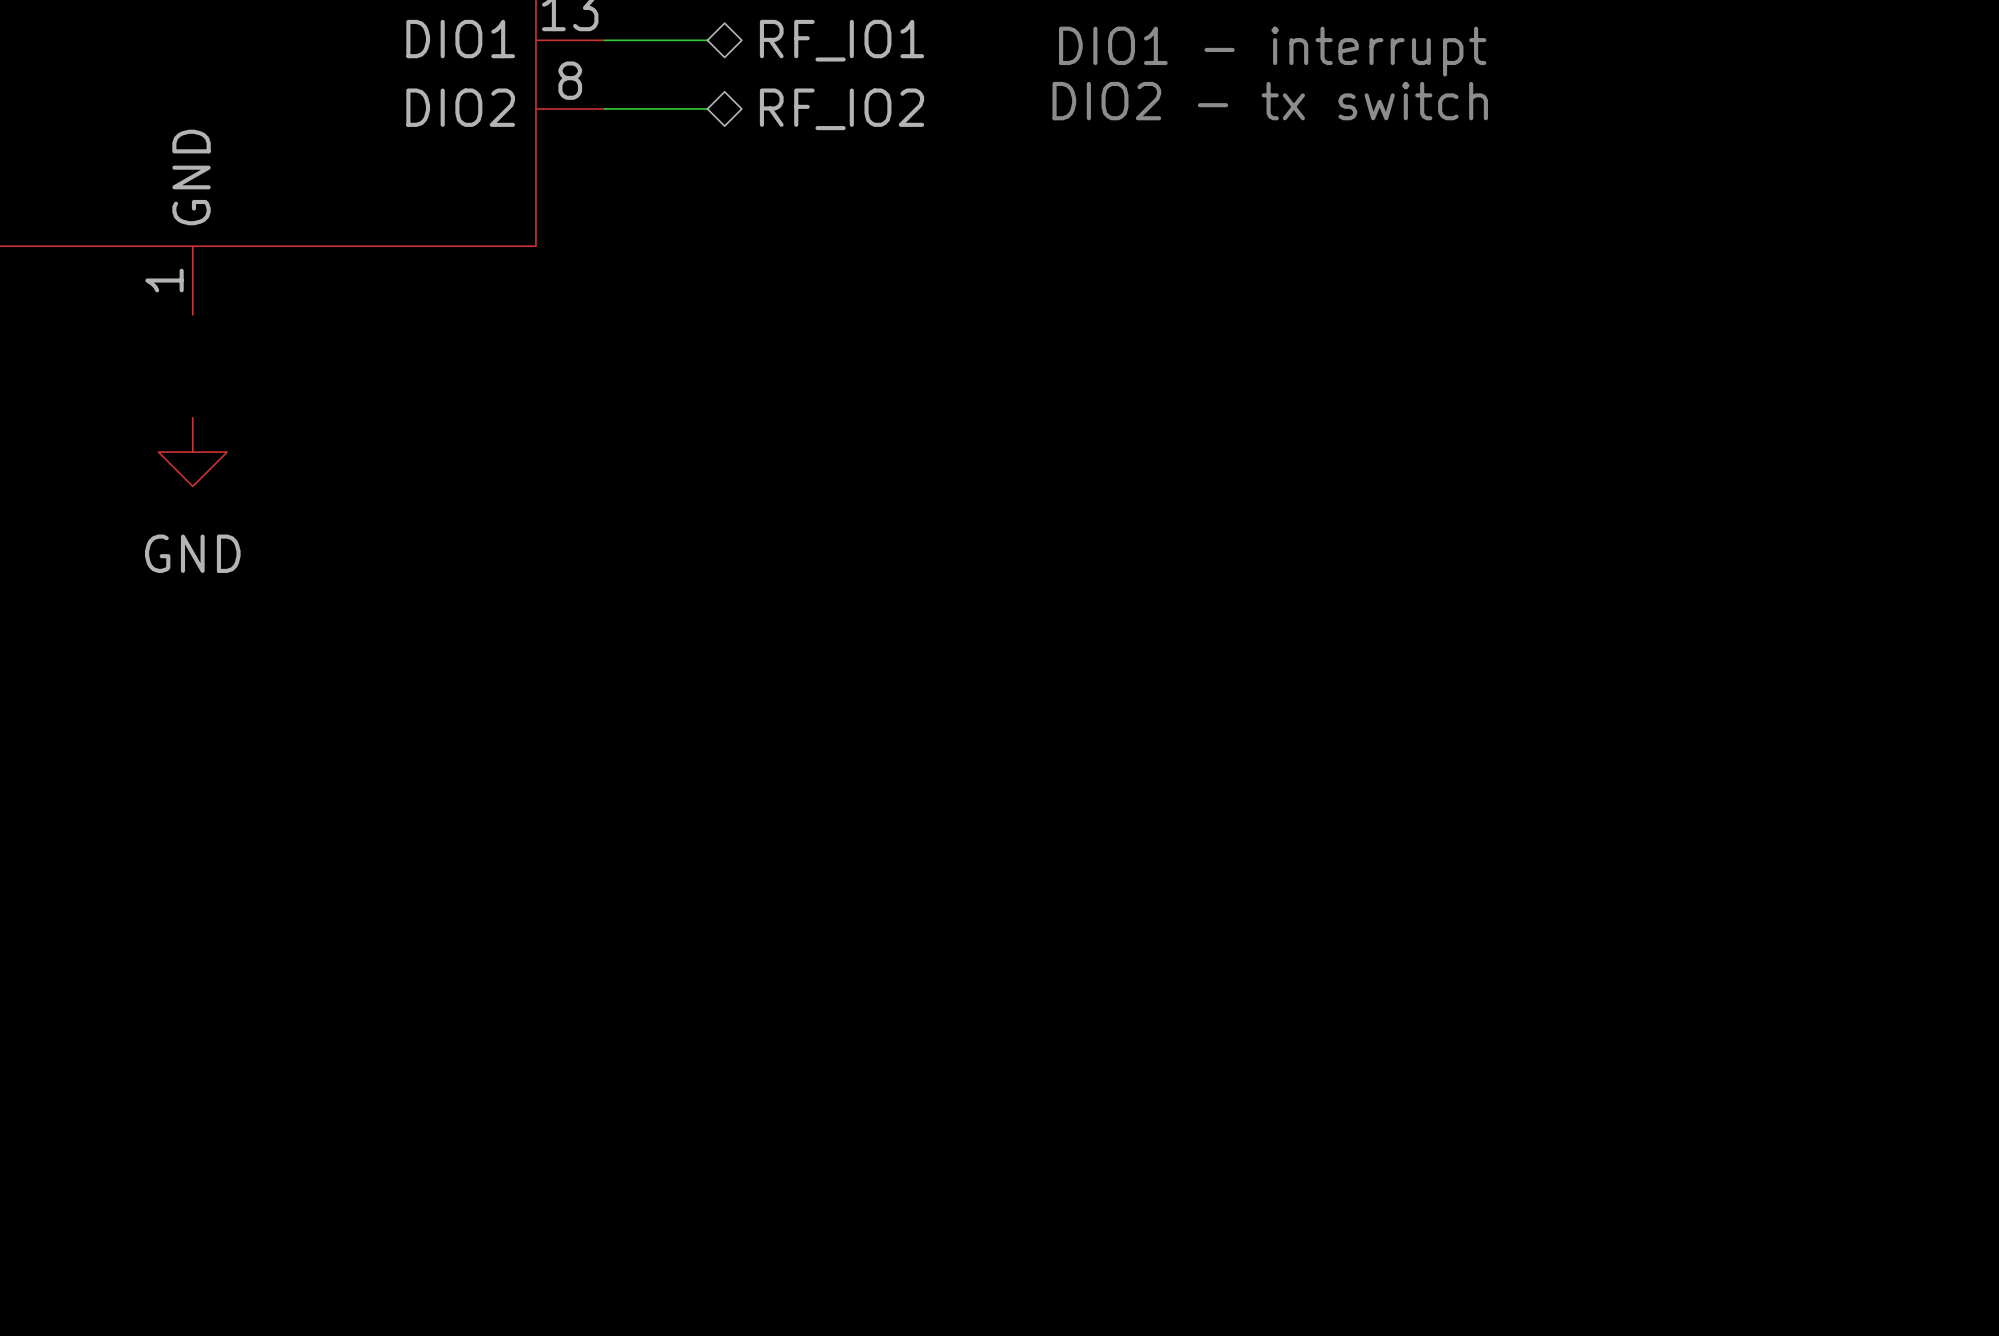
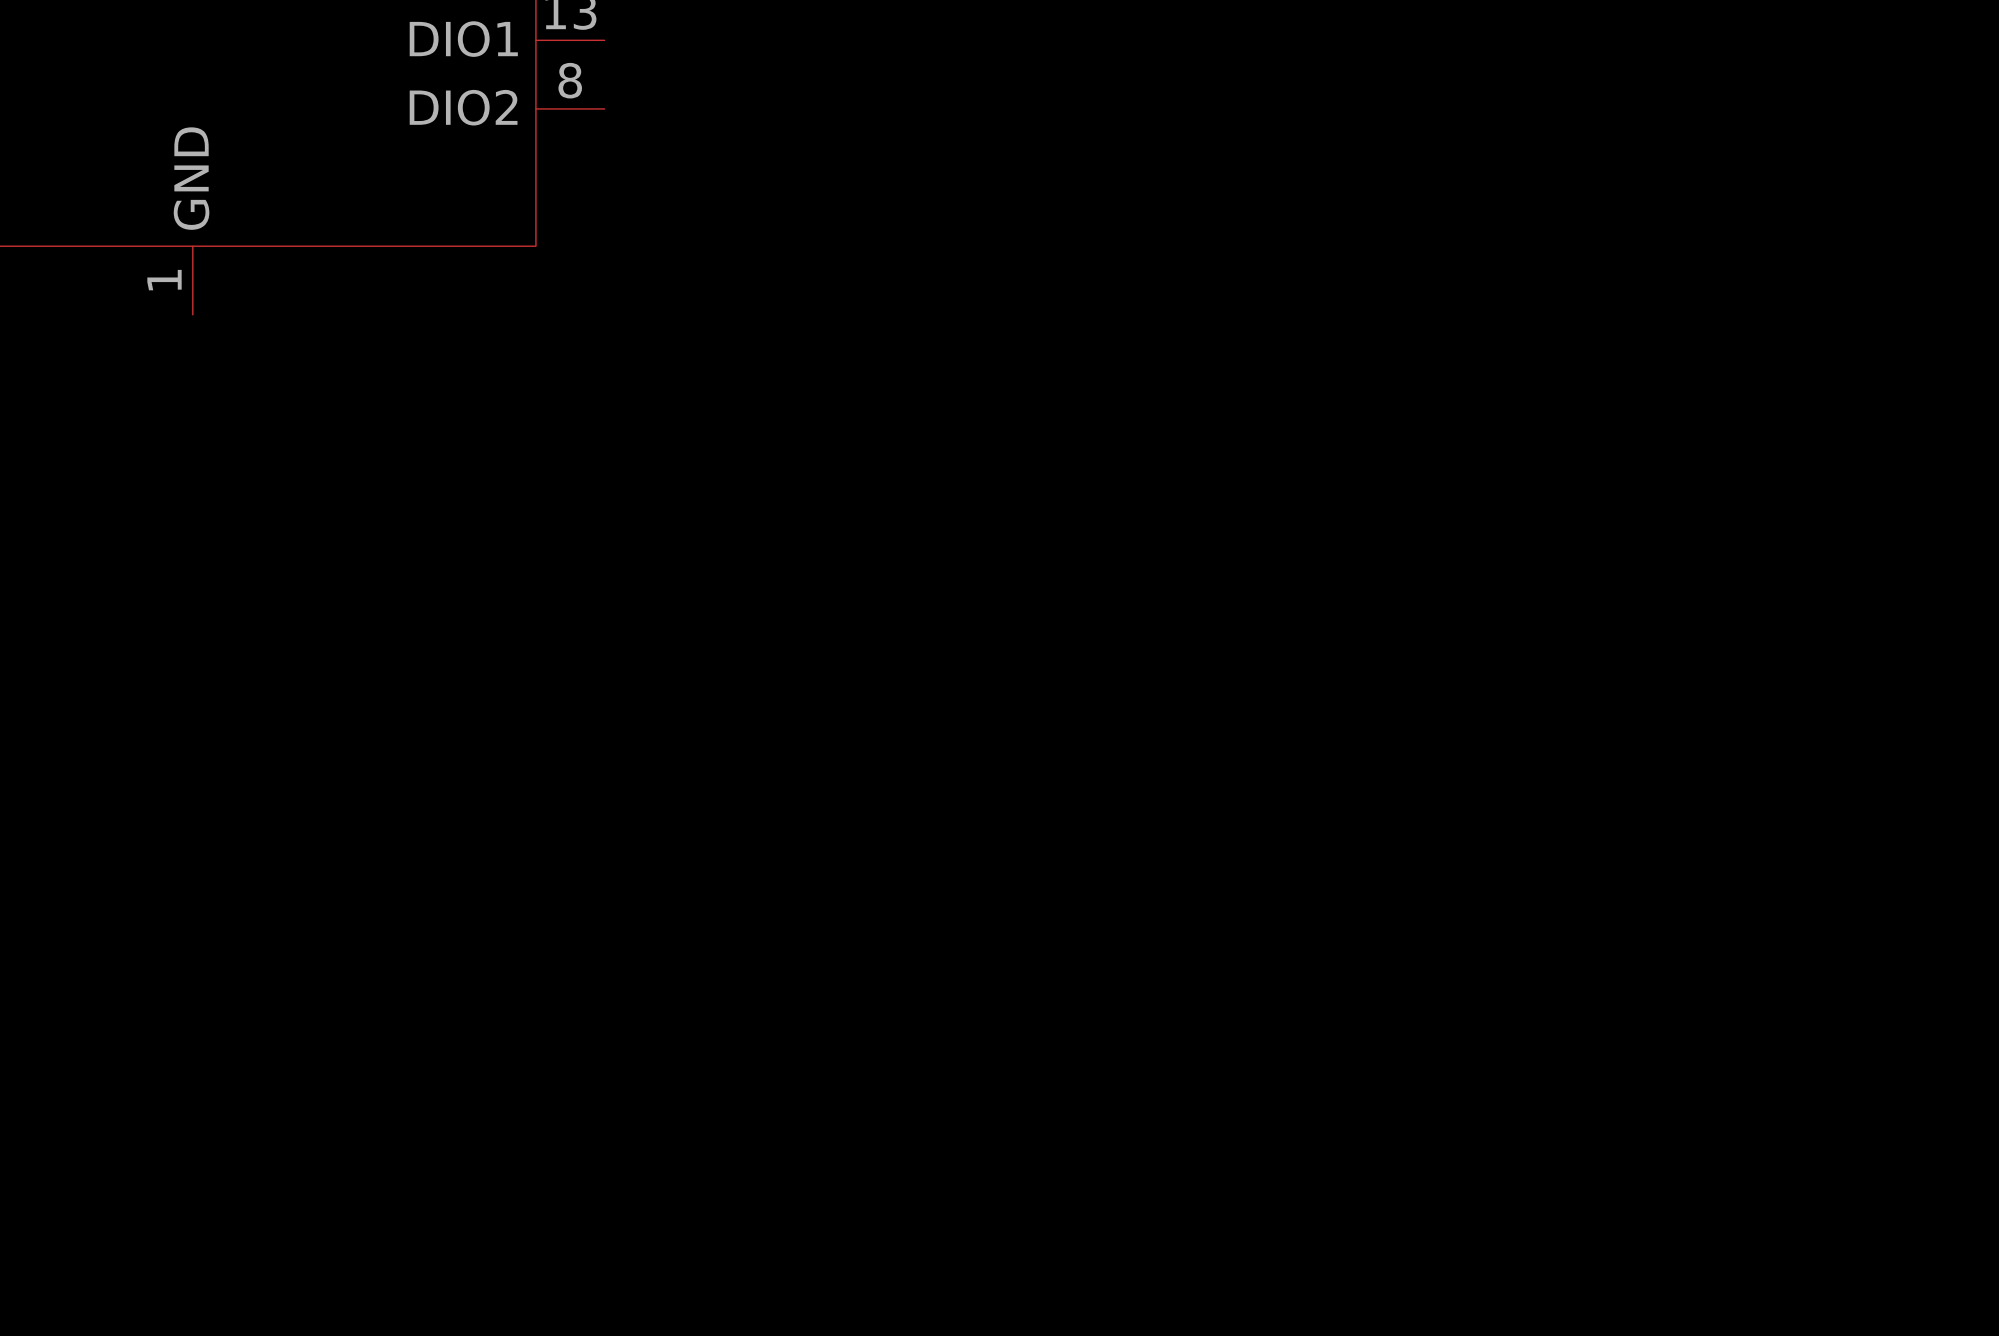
wire: (604, 40) (707, 40) -> none
hierarchical label: RF_IO1 (842, 40) -> none
text: DIO1 - interrupt (1272, 51) -> none
text: DIO2 - tx switch (1270, 101) -> none
wire: (604, 108) (707, 108) -> none
hierarchical label: RF_IO2 (842, 109) -> none
power symbol: GND (192, 452) -> none

